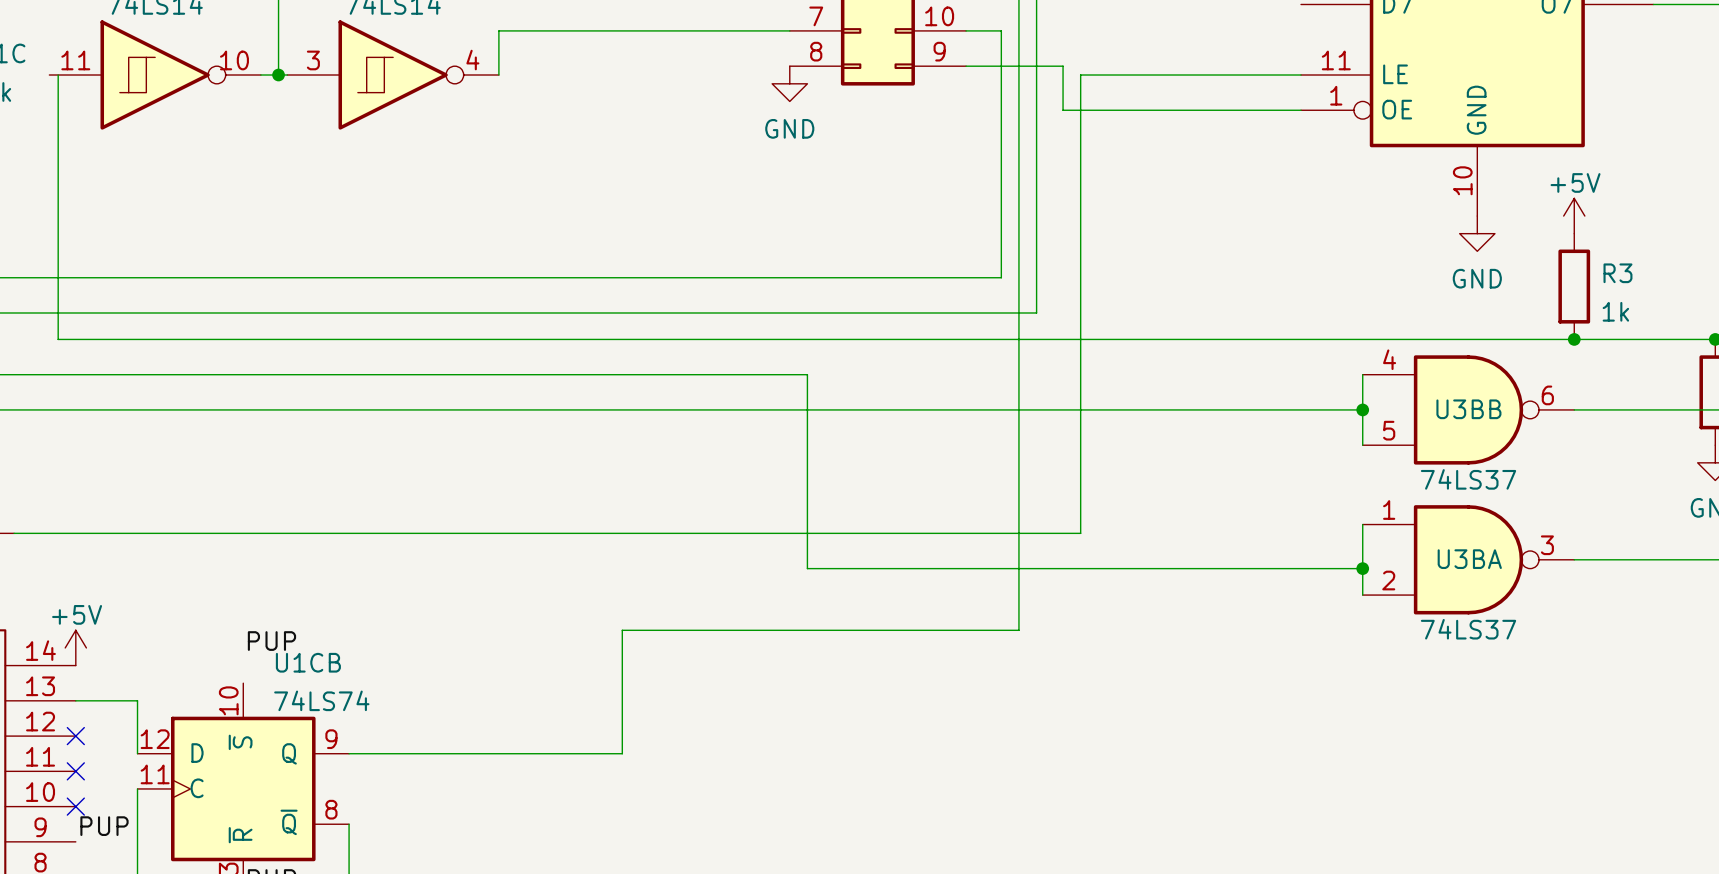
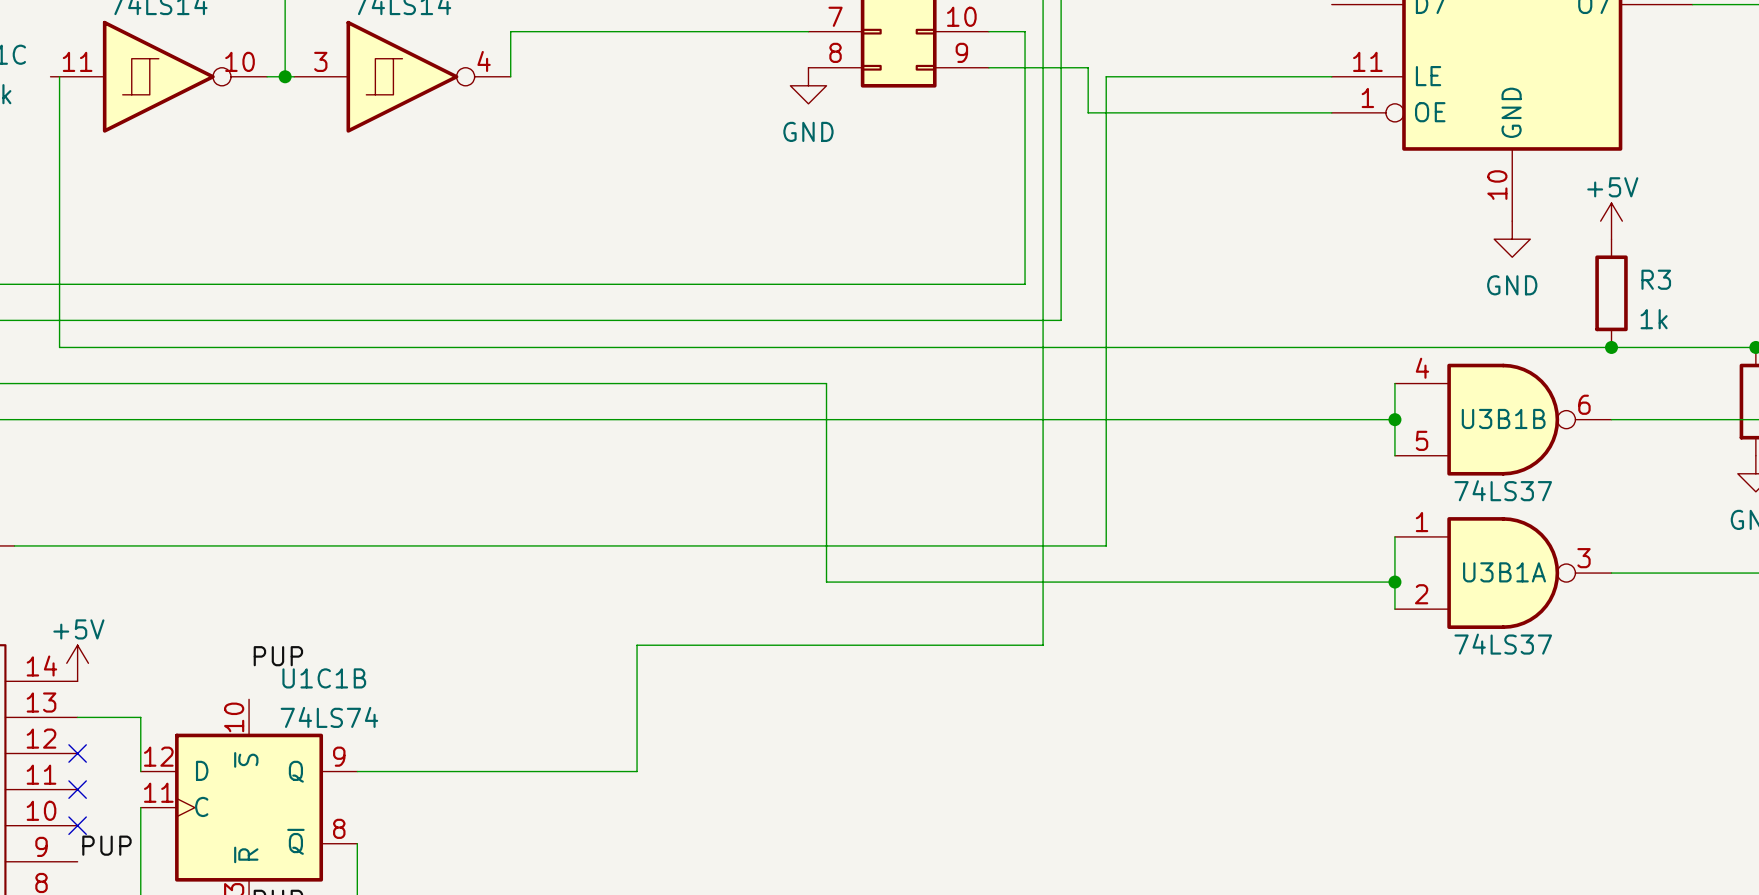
U3BB name: U3BB (1468, 409) -> U3B1B (1503, 418)
U3BA name: U3BA (1469, 559) -> U3B1A (1504, 572)
U1CB name: U1CB (308, 662) -> U1C1B (324, 678)

